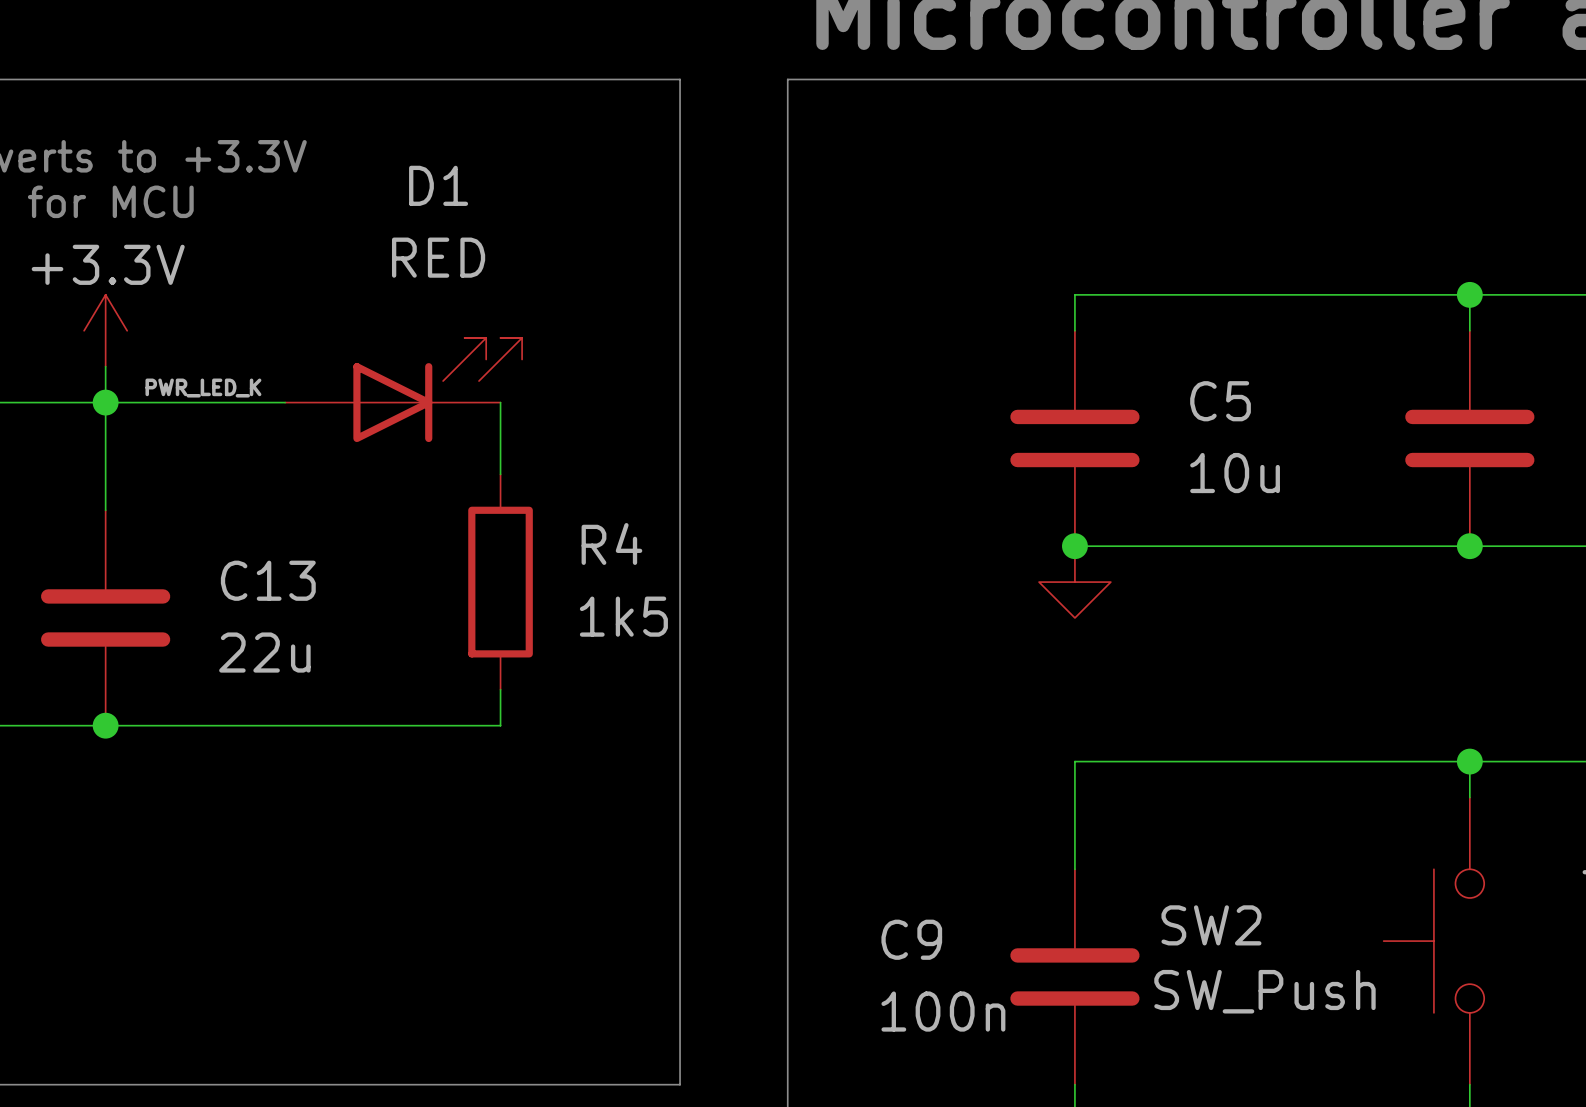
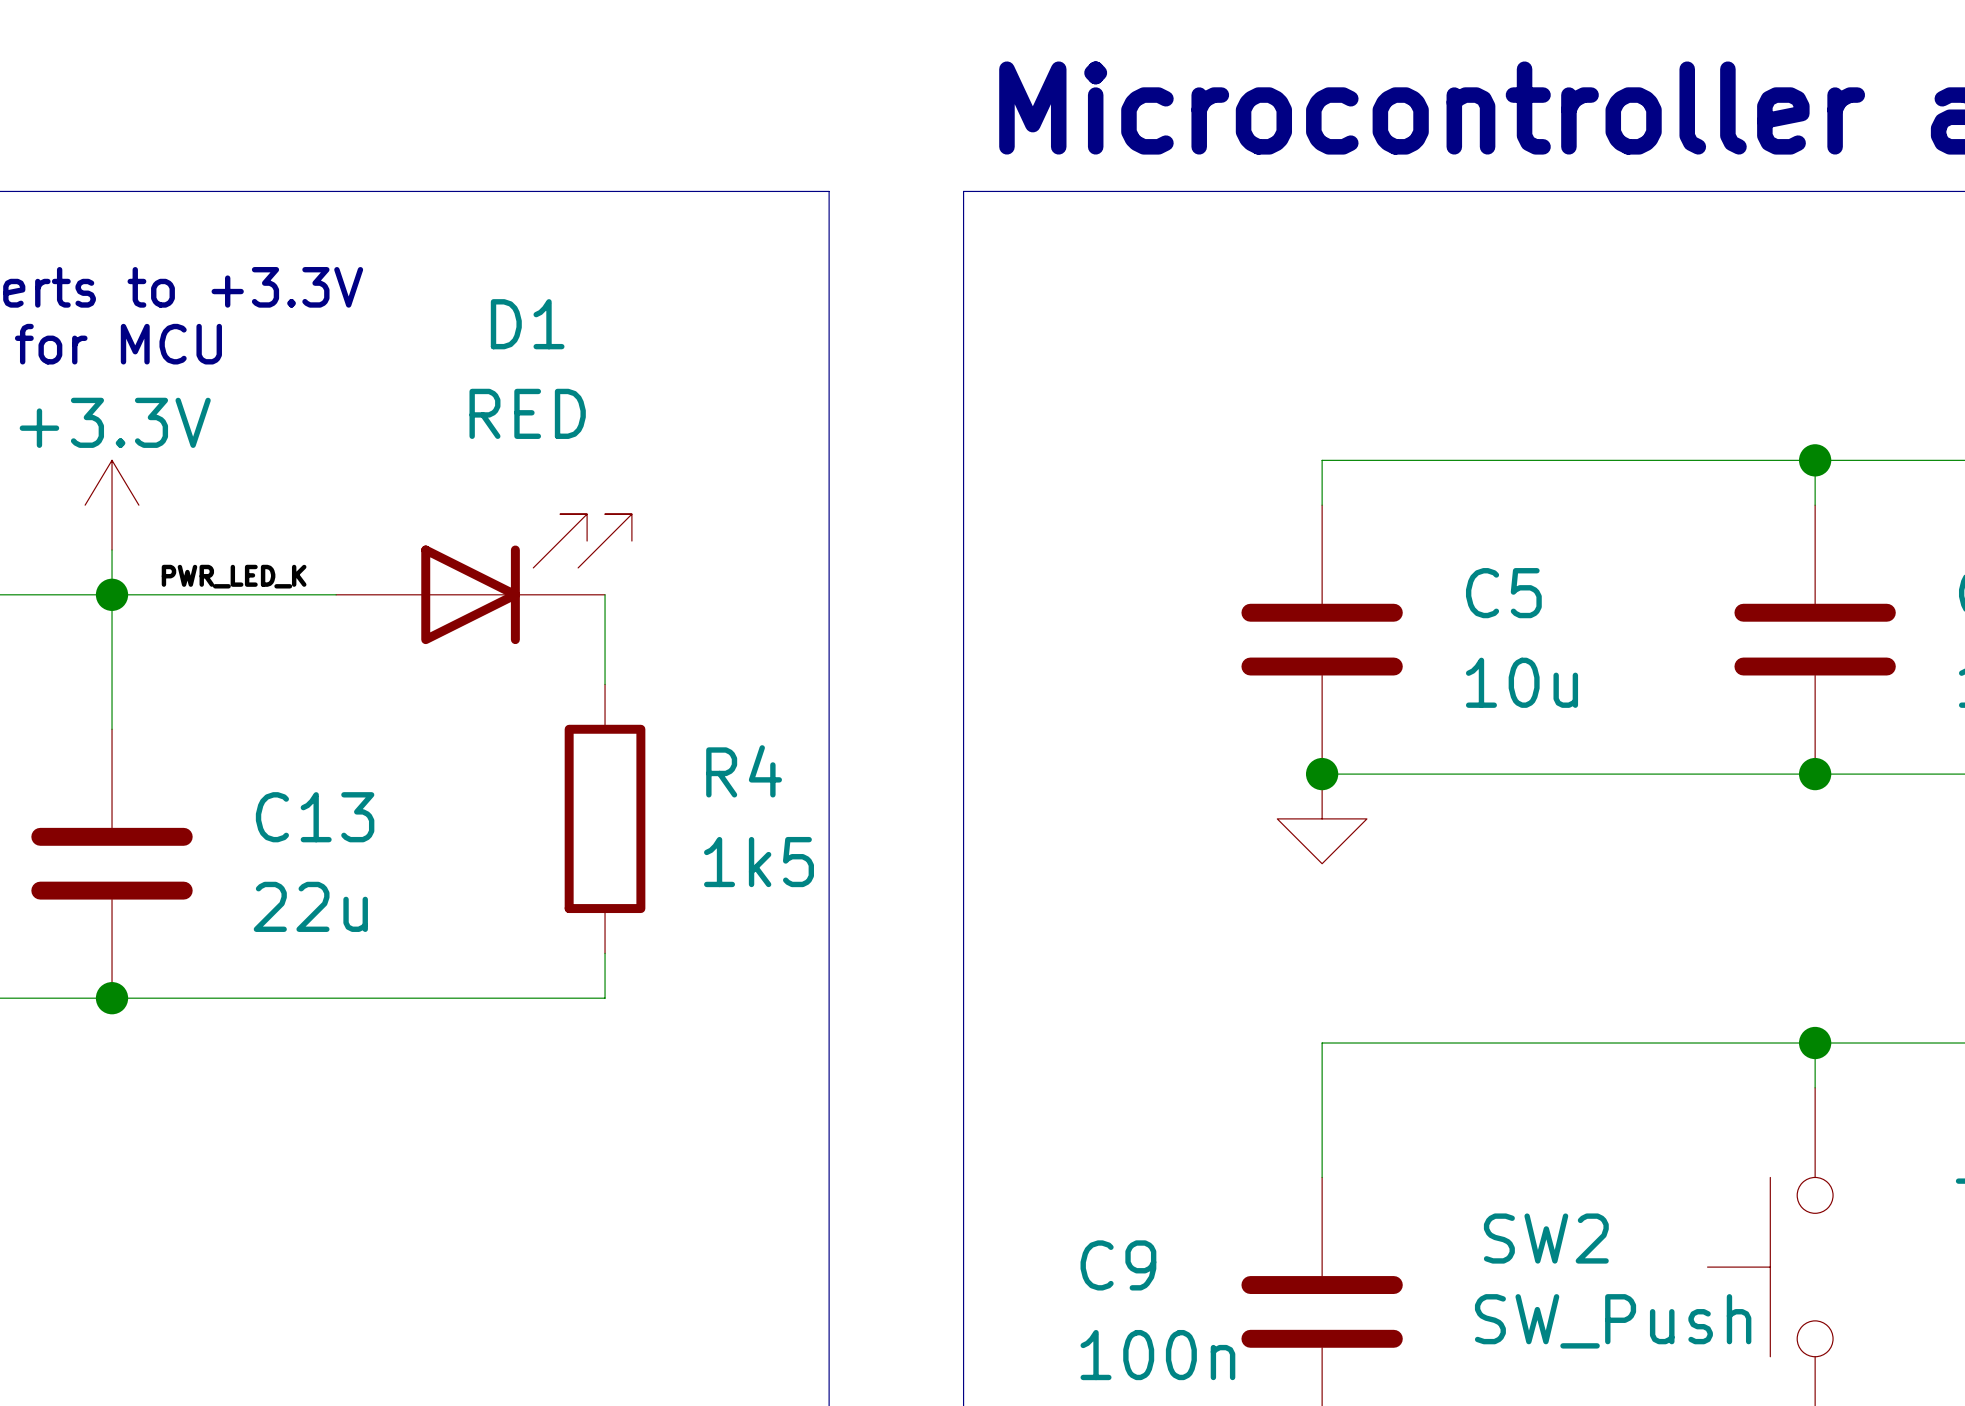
SW2 name position: SW2 (1211, 925) -> SW2 (1546, 1238)
SW2 value position: SW_Push (1264, 991) -> SW_Push (1613, 1321)

